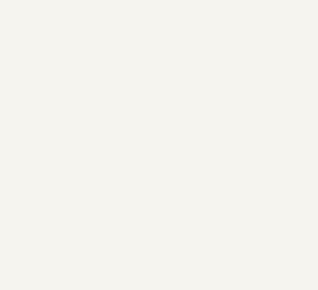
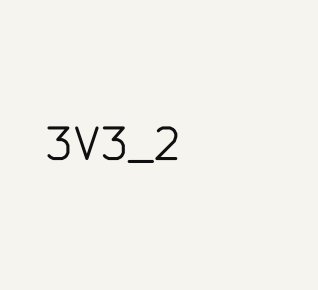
label: none -> 3V3_2 (112, 144)

